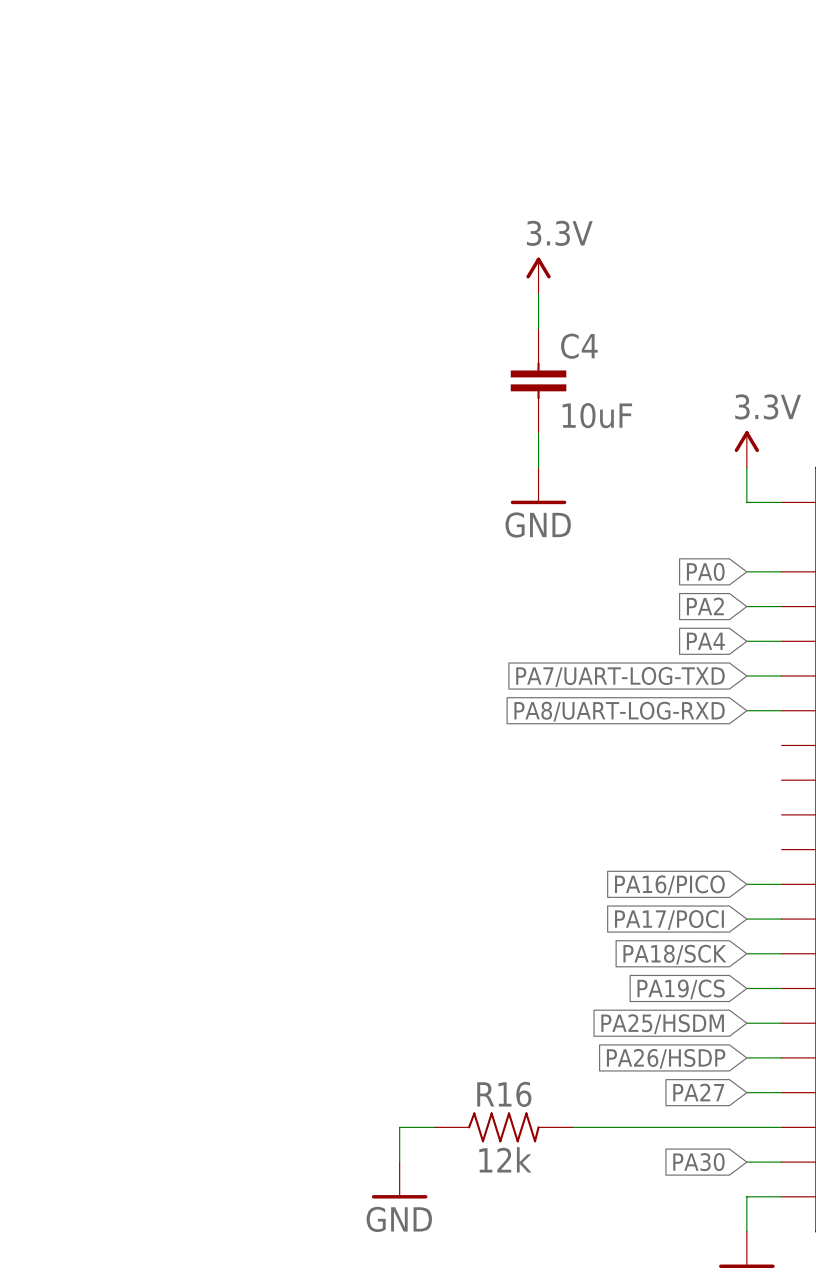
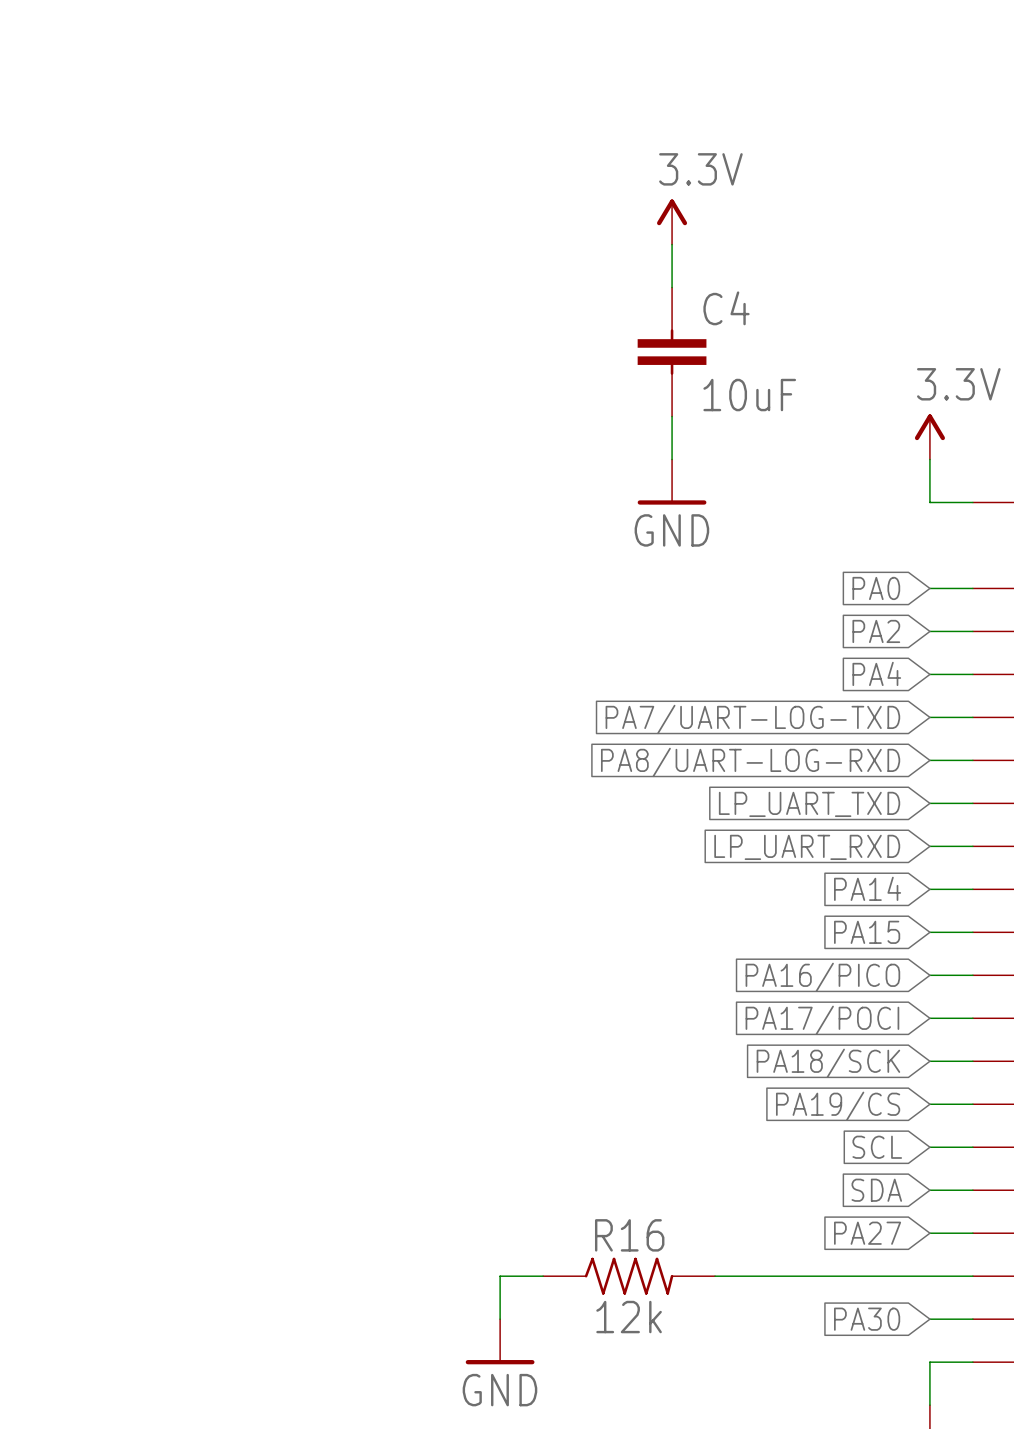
wire: none -> (929, 803) (972, 803)
global label: none -> LP_UART_TXD (809, 804)
wire: none -> (929, 846) (972, 846)
global label: none -> LP_UART_RXD (807, 847)
global label: none -> PA14 (867, 888)
wire: none -> (929, 889) (972, 889)
global label: none -> PA15 (867, 932)
wire: none -> (929, 932) (972, 932)
global label: PA25/HSDM (662, 1024) -> SCL (877, 1147)
global label: PA26/HSDP (666, 1058) -> SDA (876, 1190)

